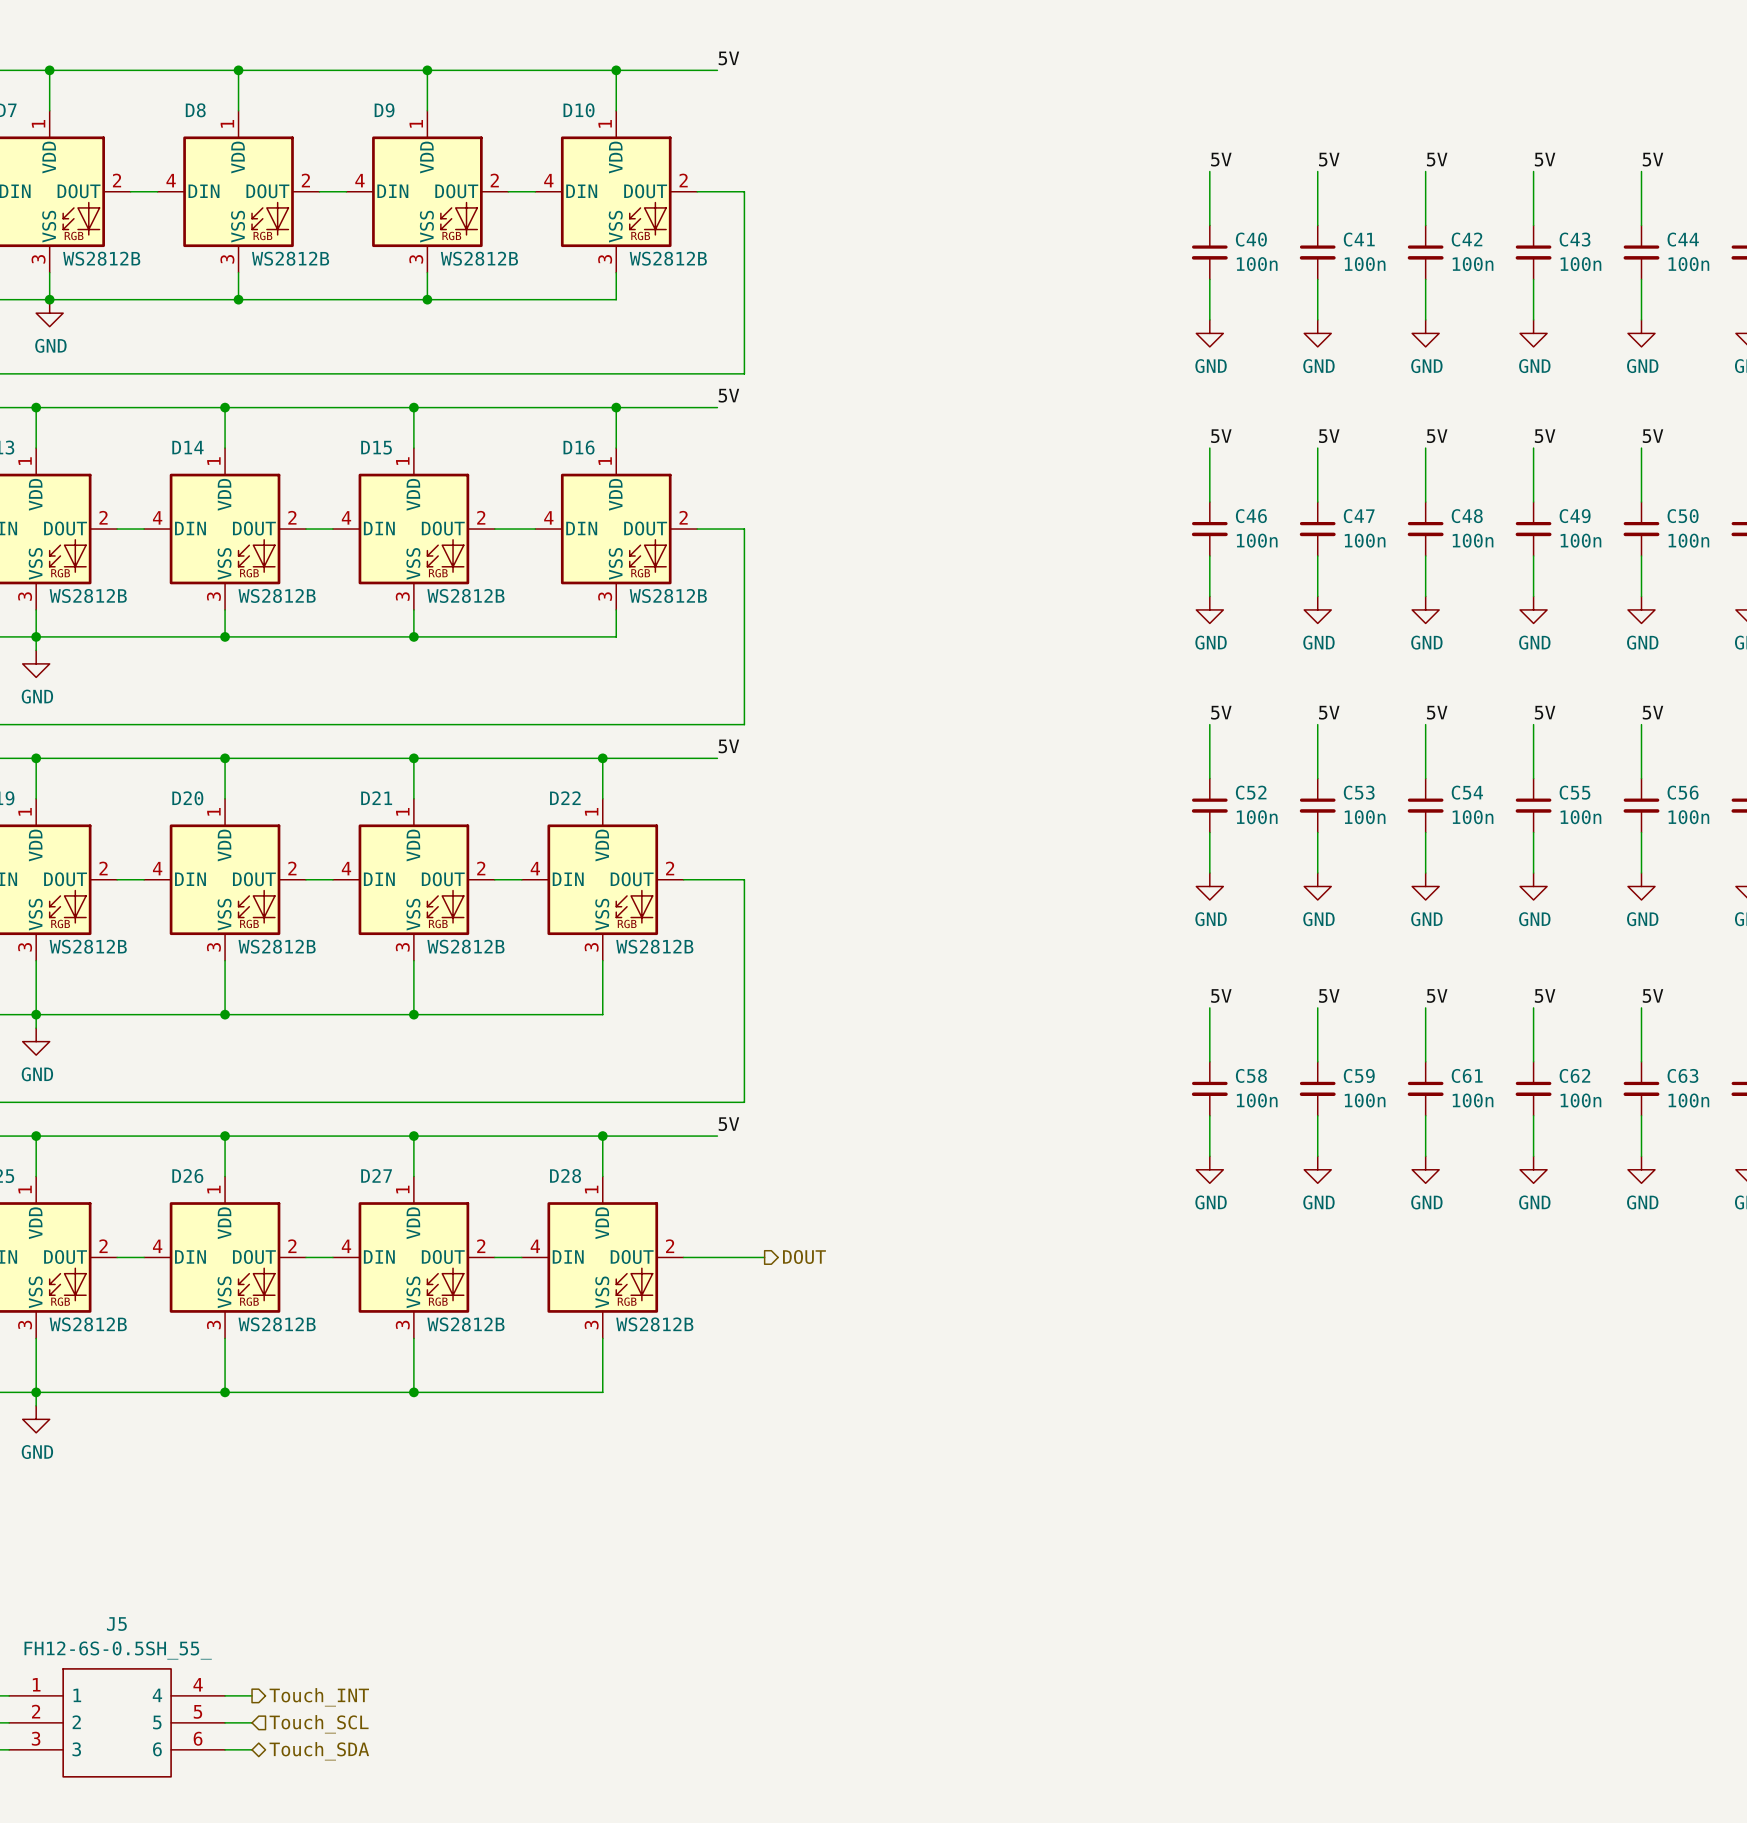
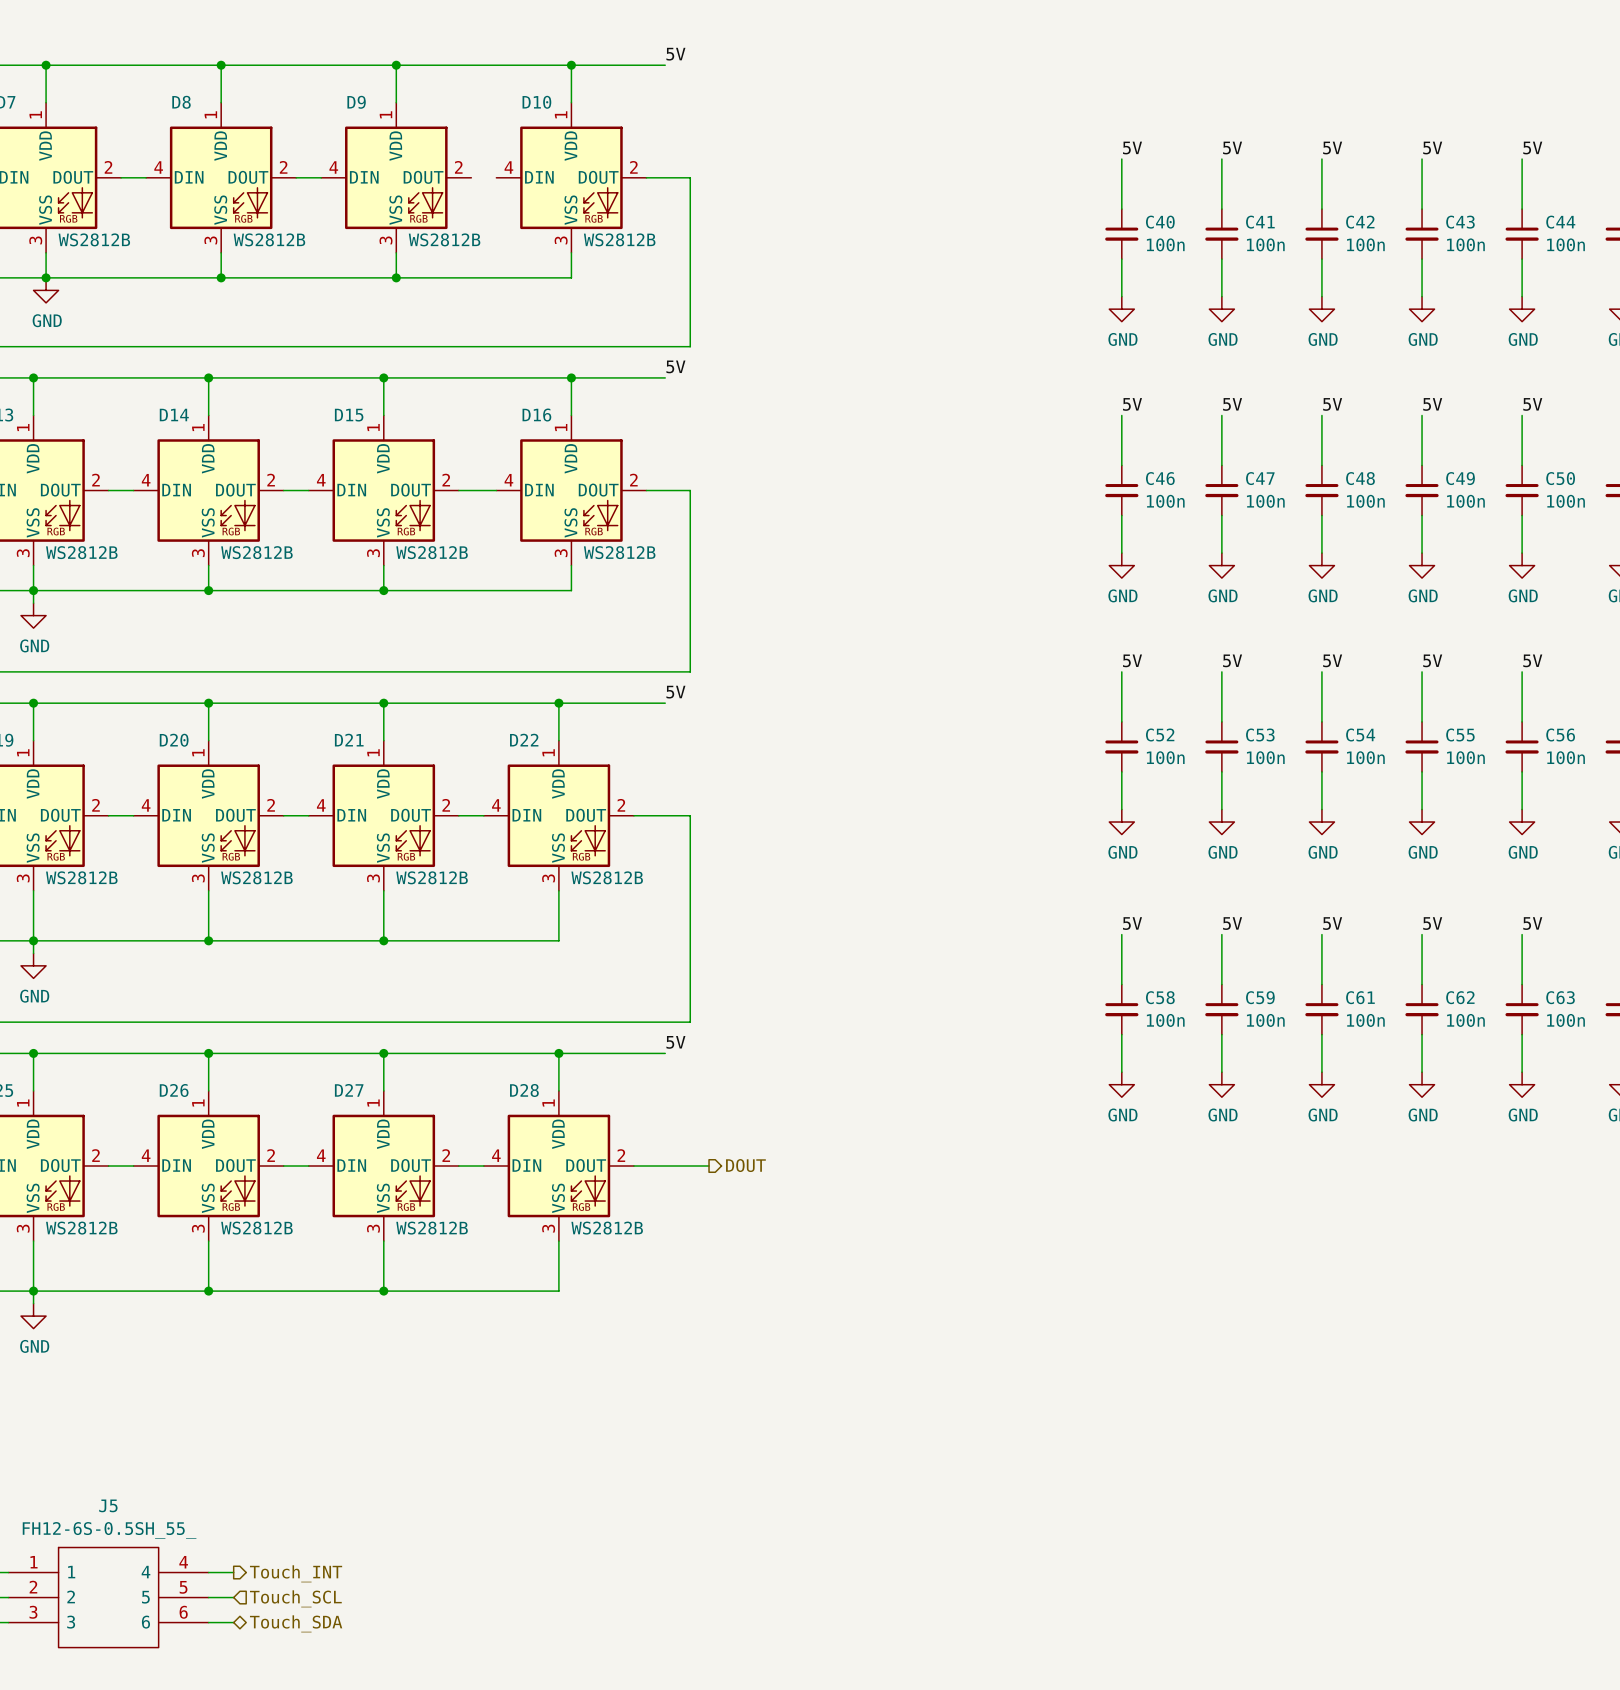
wire: (508, 191) (535, 191) -> none

